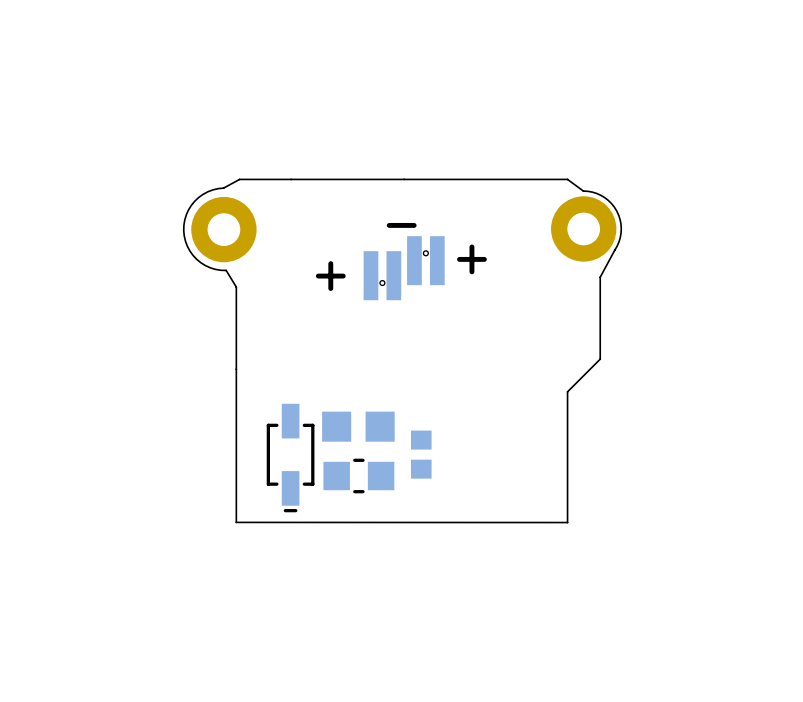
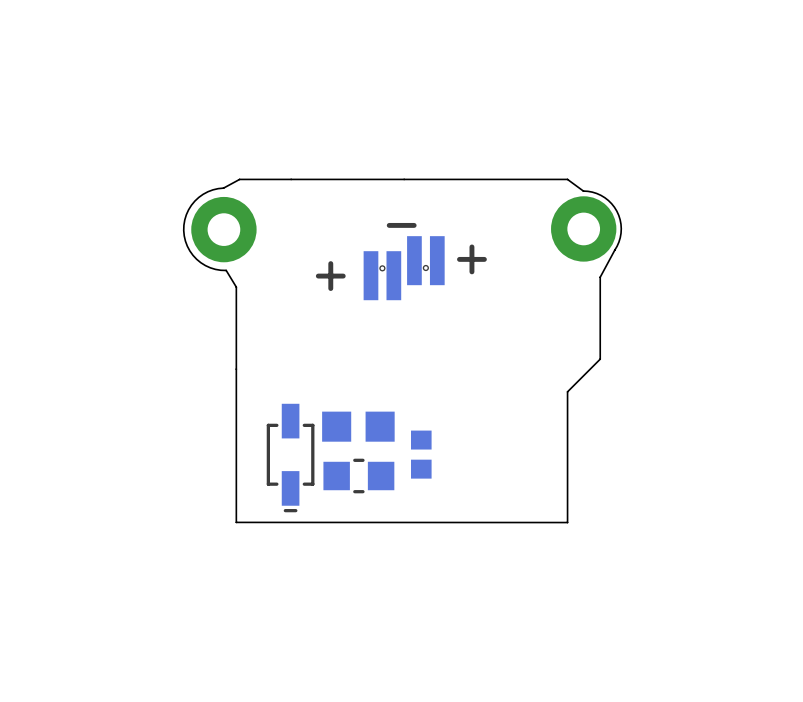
part rotation: 0° (425, 260) -> 180° (425, 260)
part rotation: 0° (382, 275) -> 180° (382, 275)

